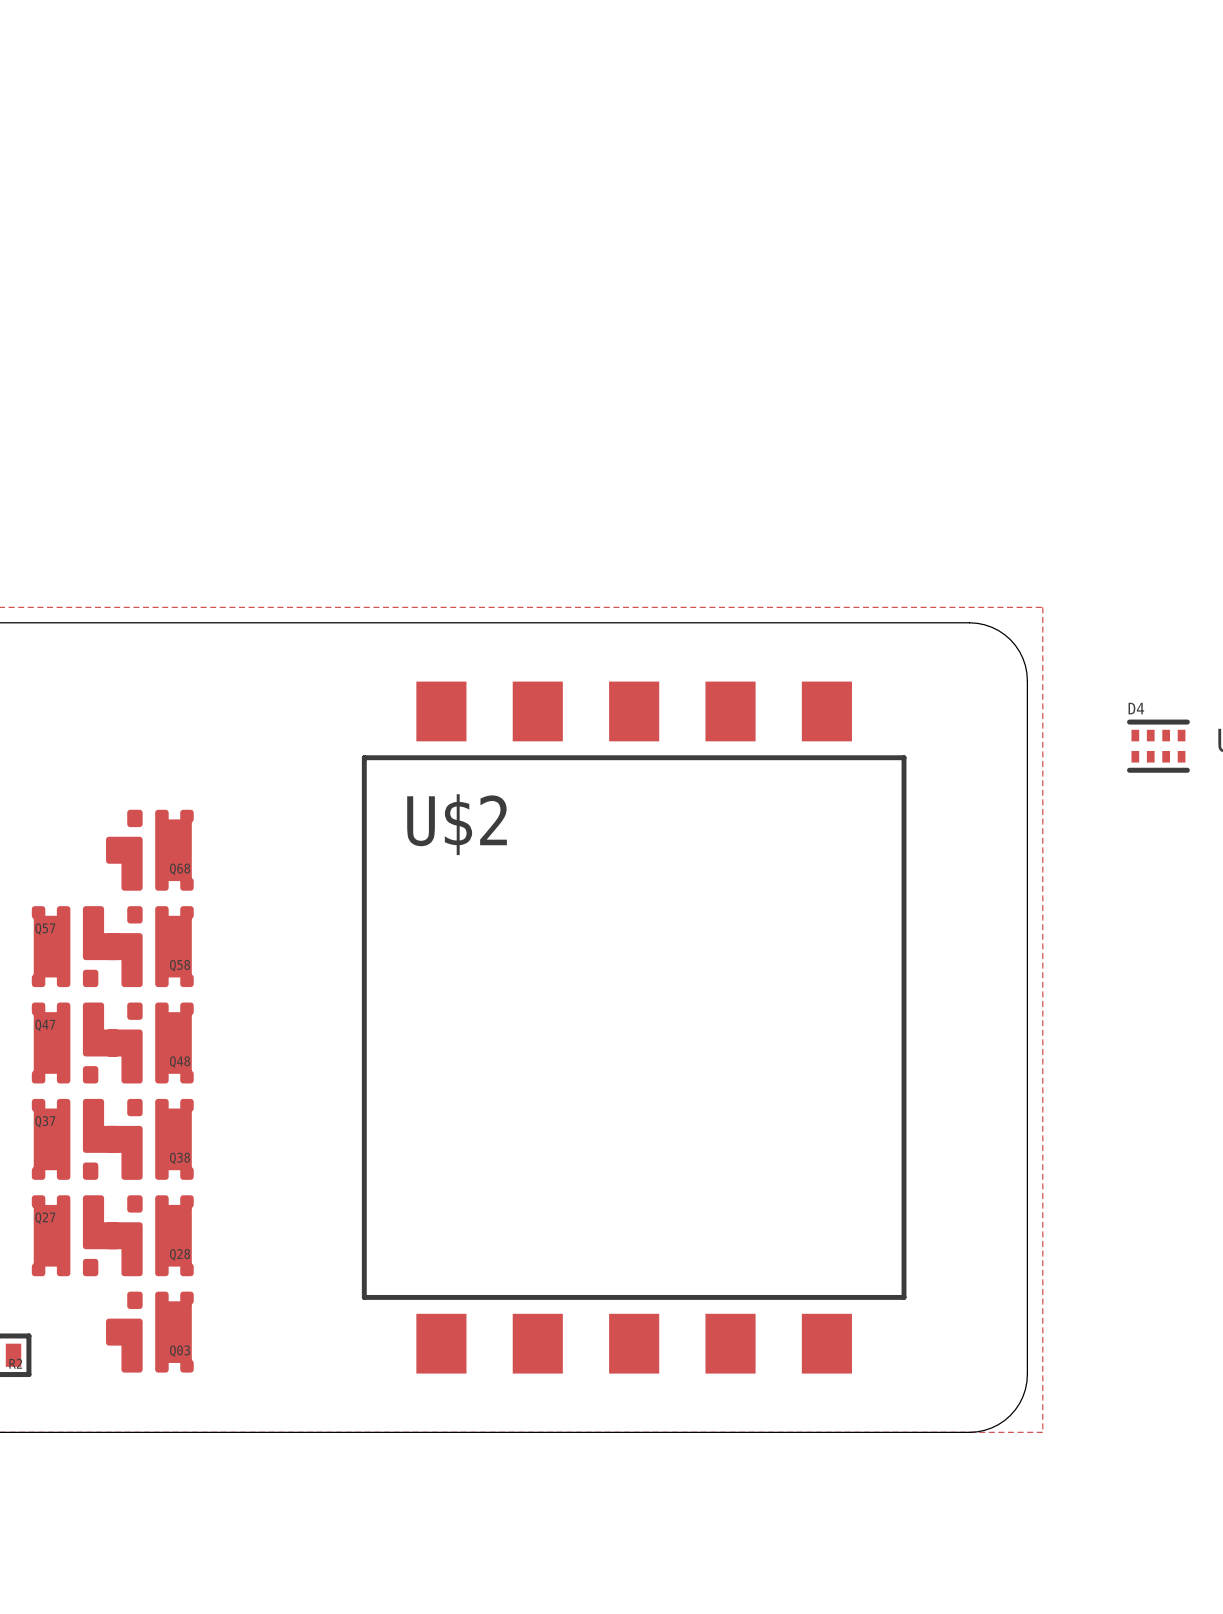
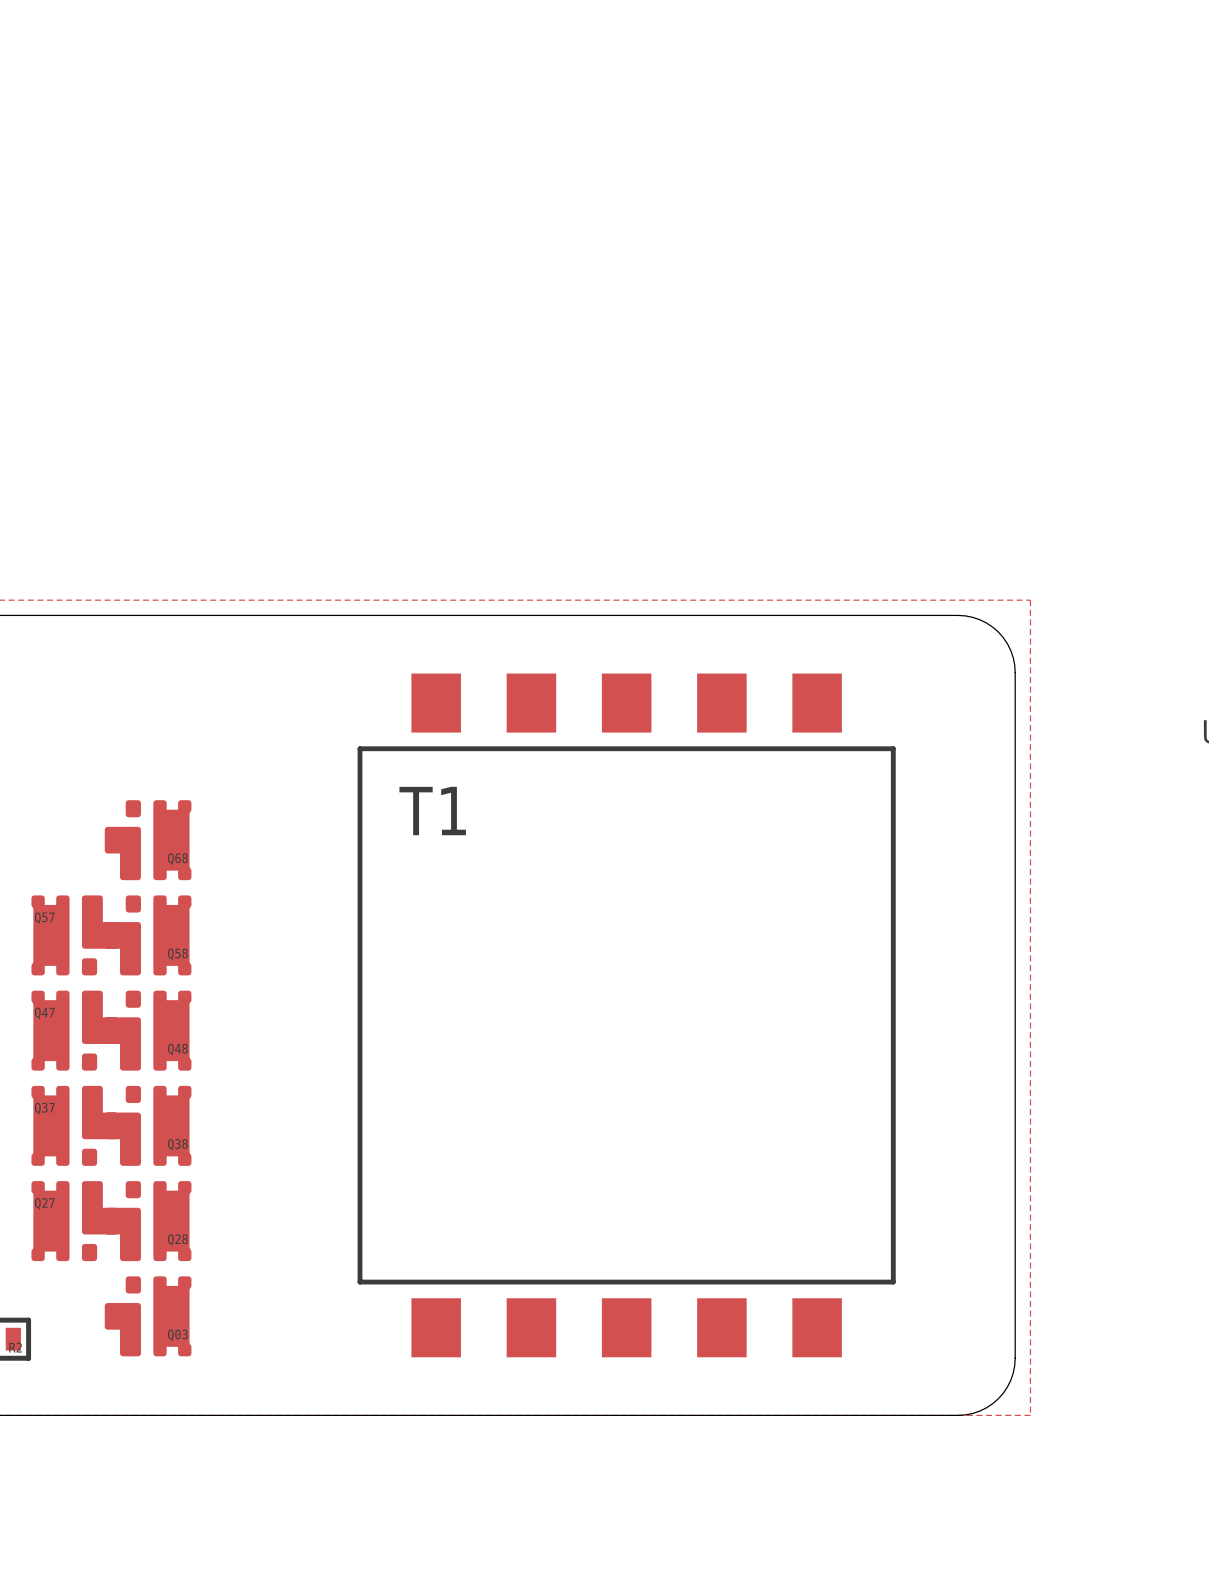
D4: (1158, 746) -> none
U$2 name: U$2 (457, 824) -> T1 (432, 811)

